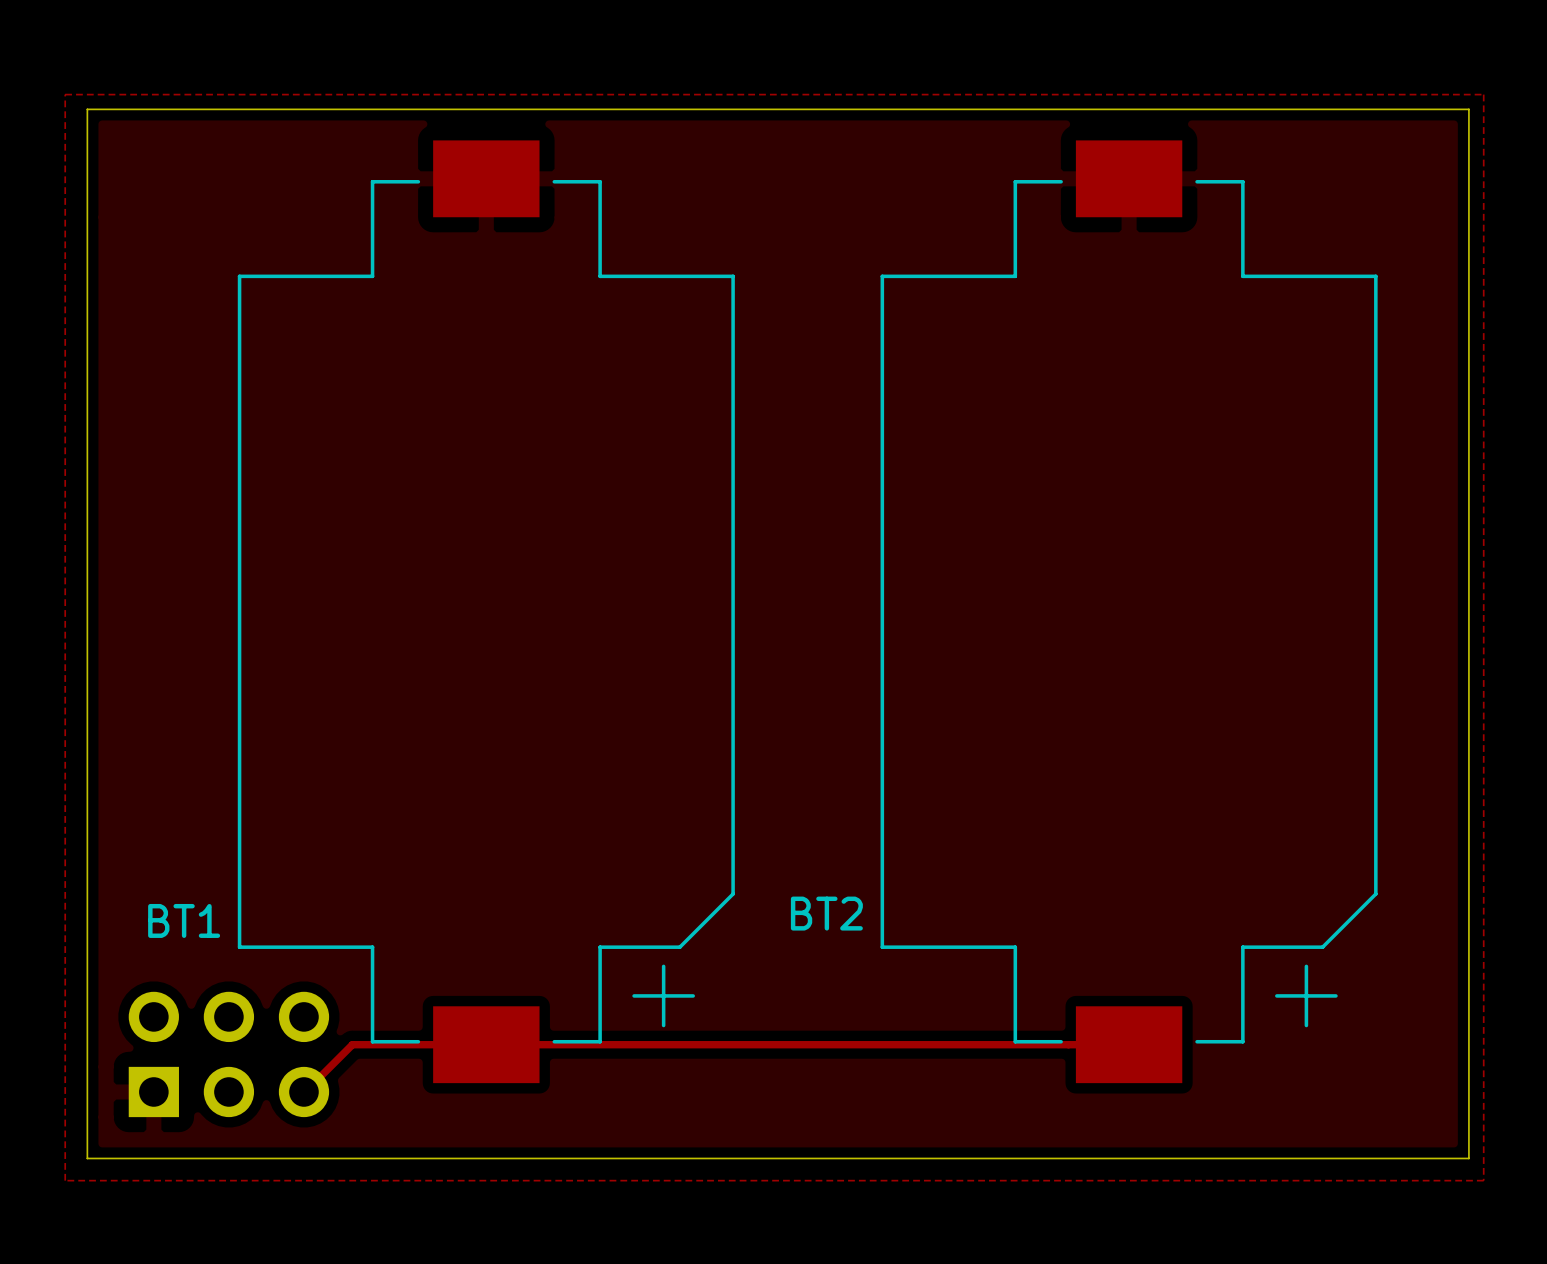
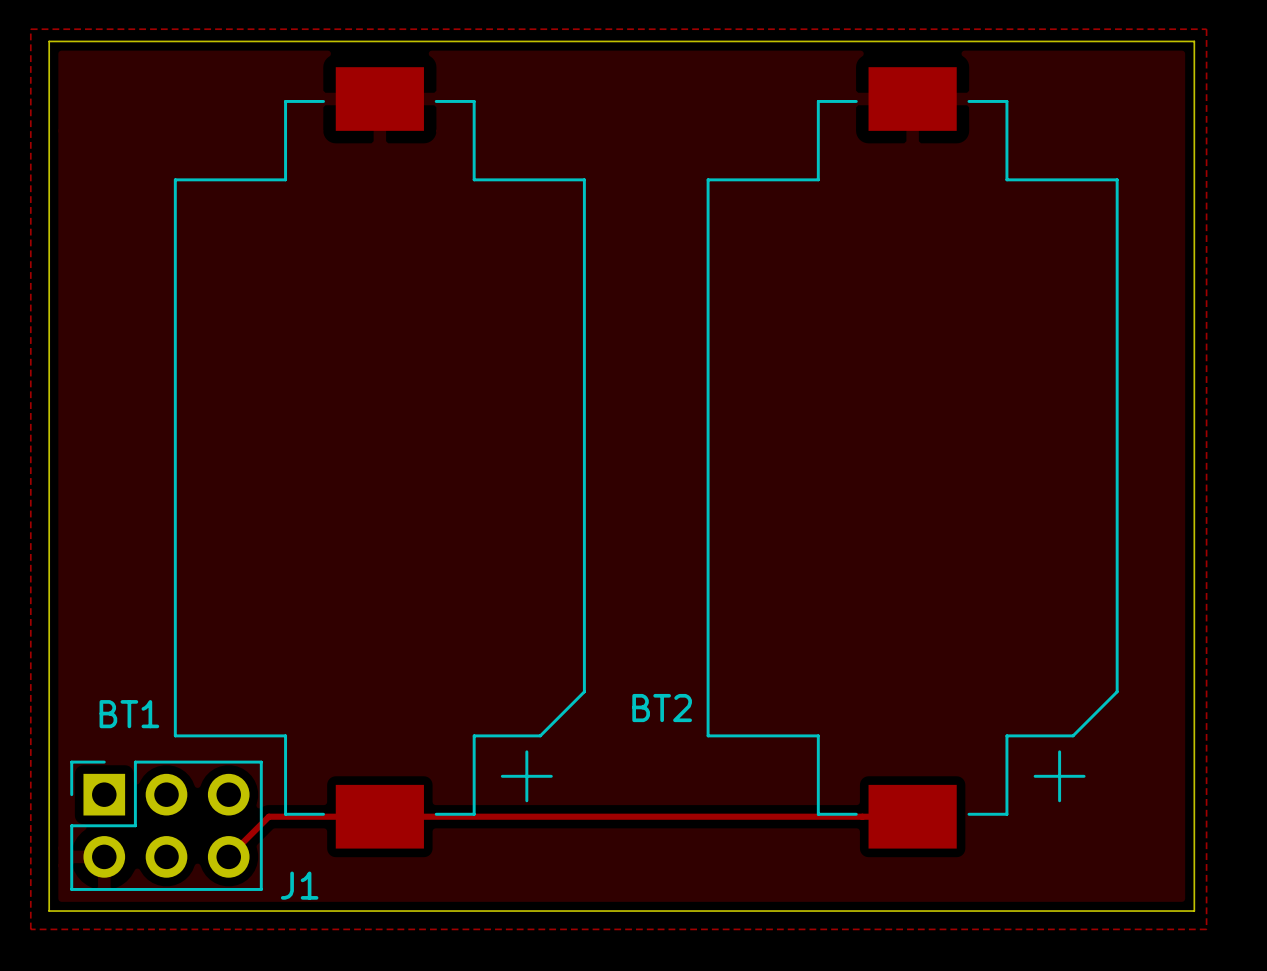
J1 side: bottom (228, 1054) -> top (166, 825)

